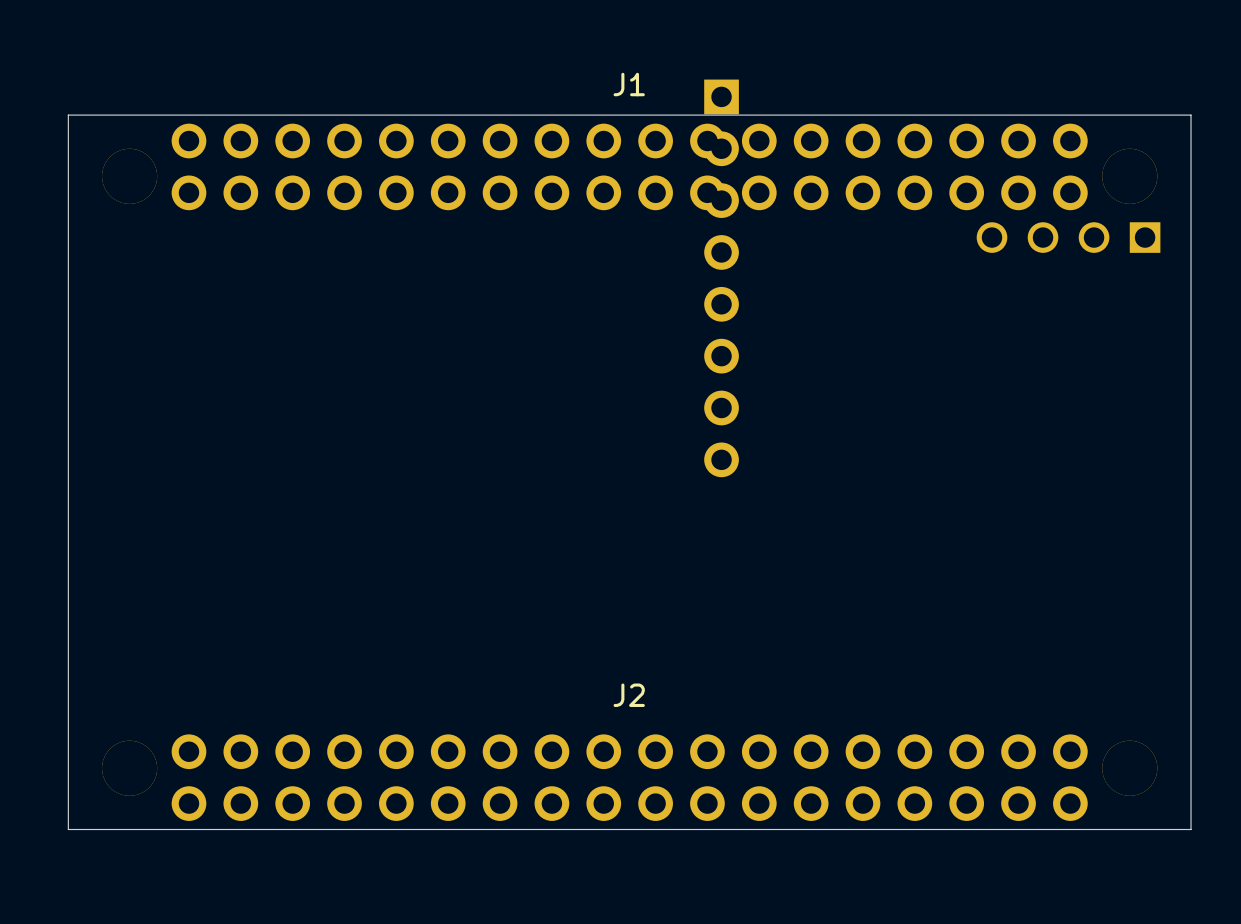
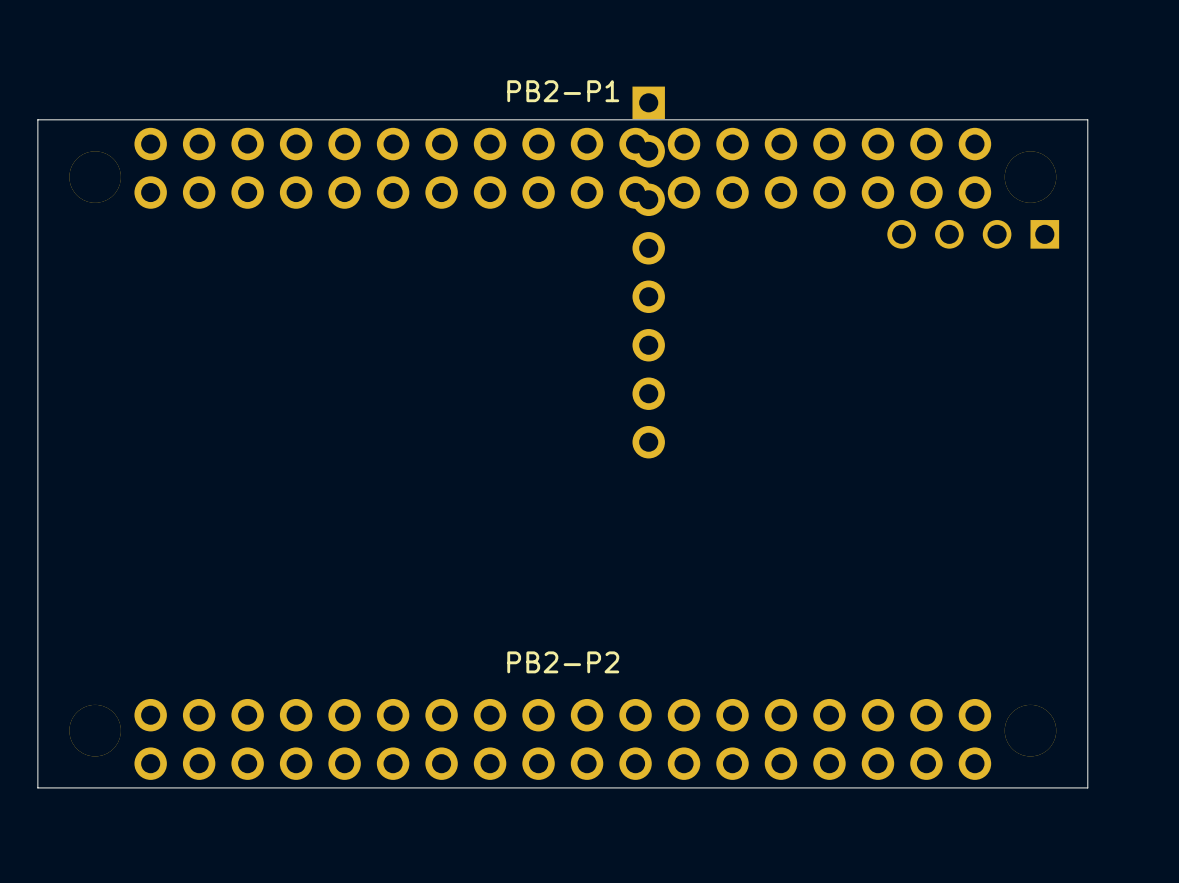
J1 name: J1 (629, 84) -> PB2-P1 (563, 91)
J2 name: J2 (629, 695) -> PB2-P2 (563, 662)

